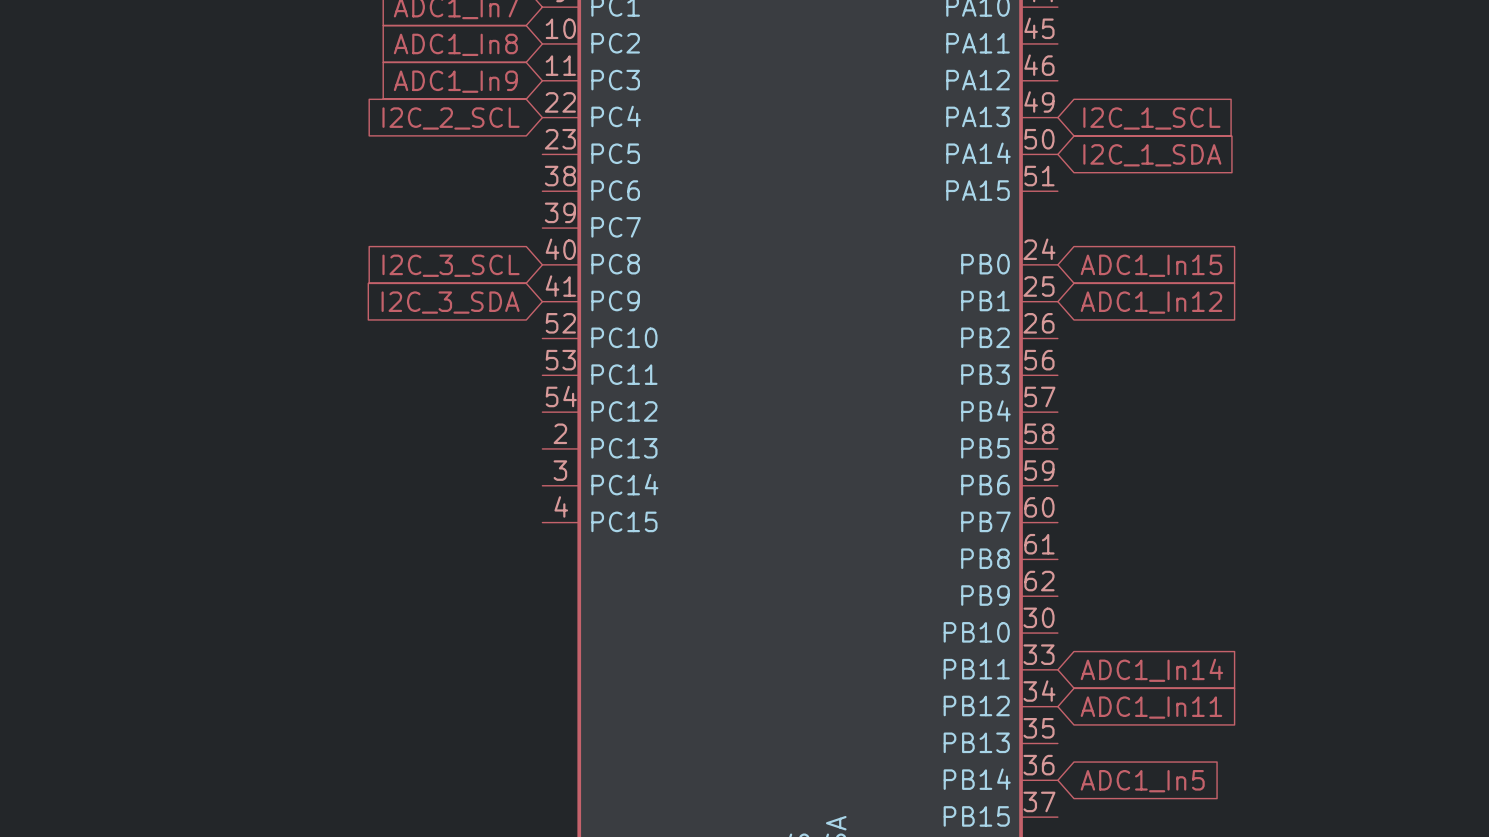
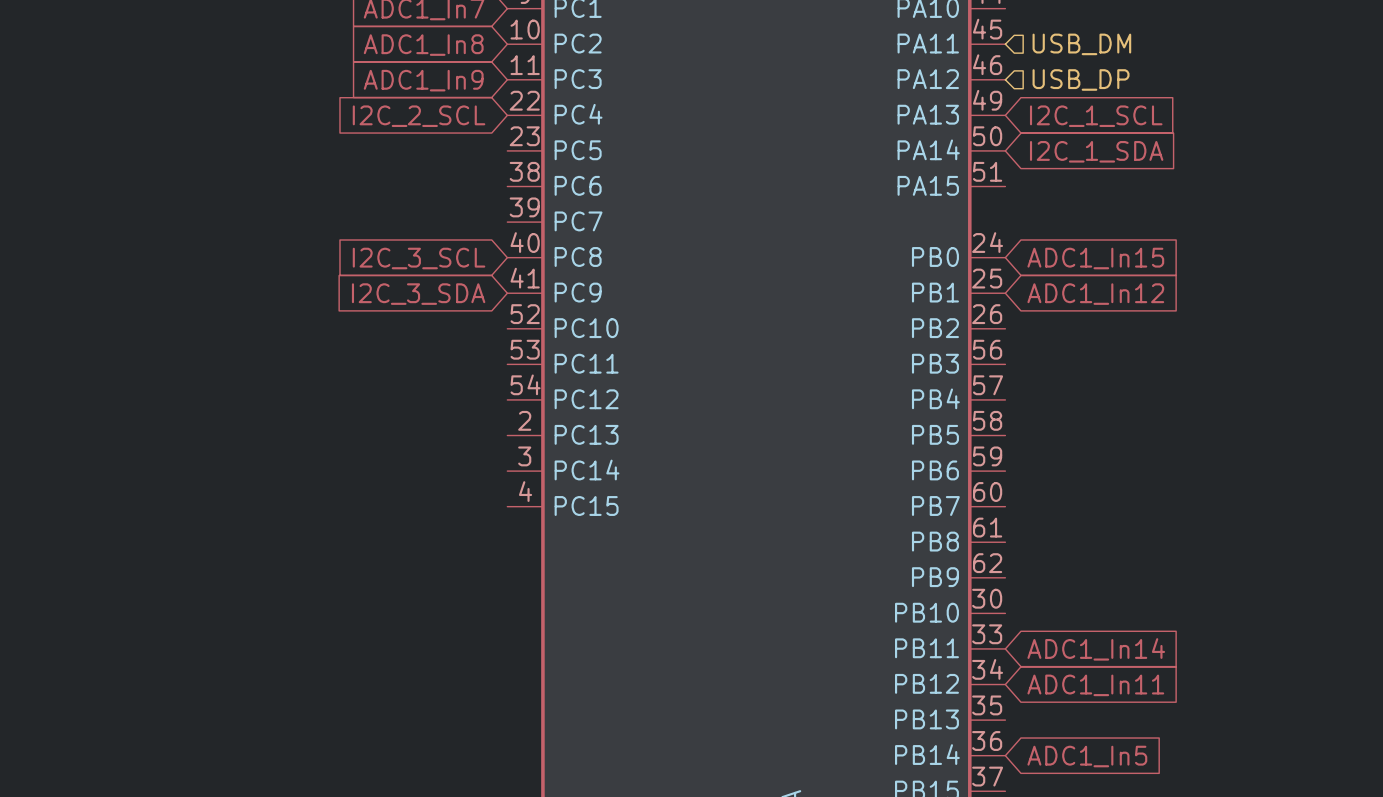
hierarchical label: none -> USB_DM (1081, 44)
hierarchical label: none -> USB_DP (1081, 79)

